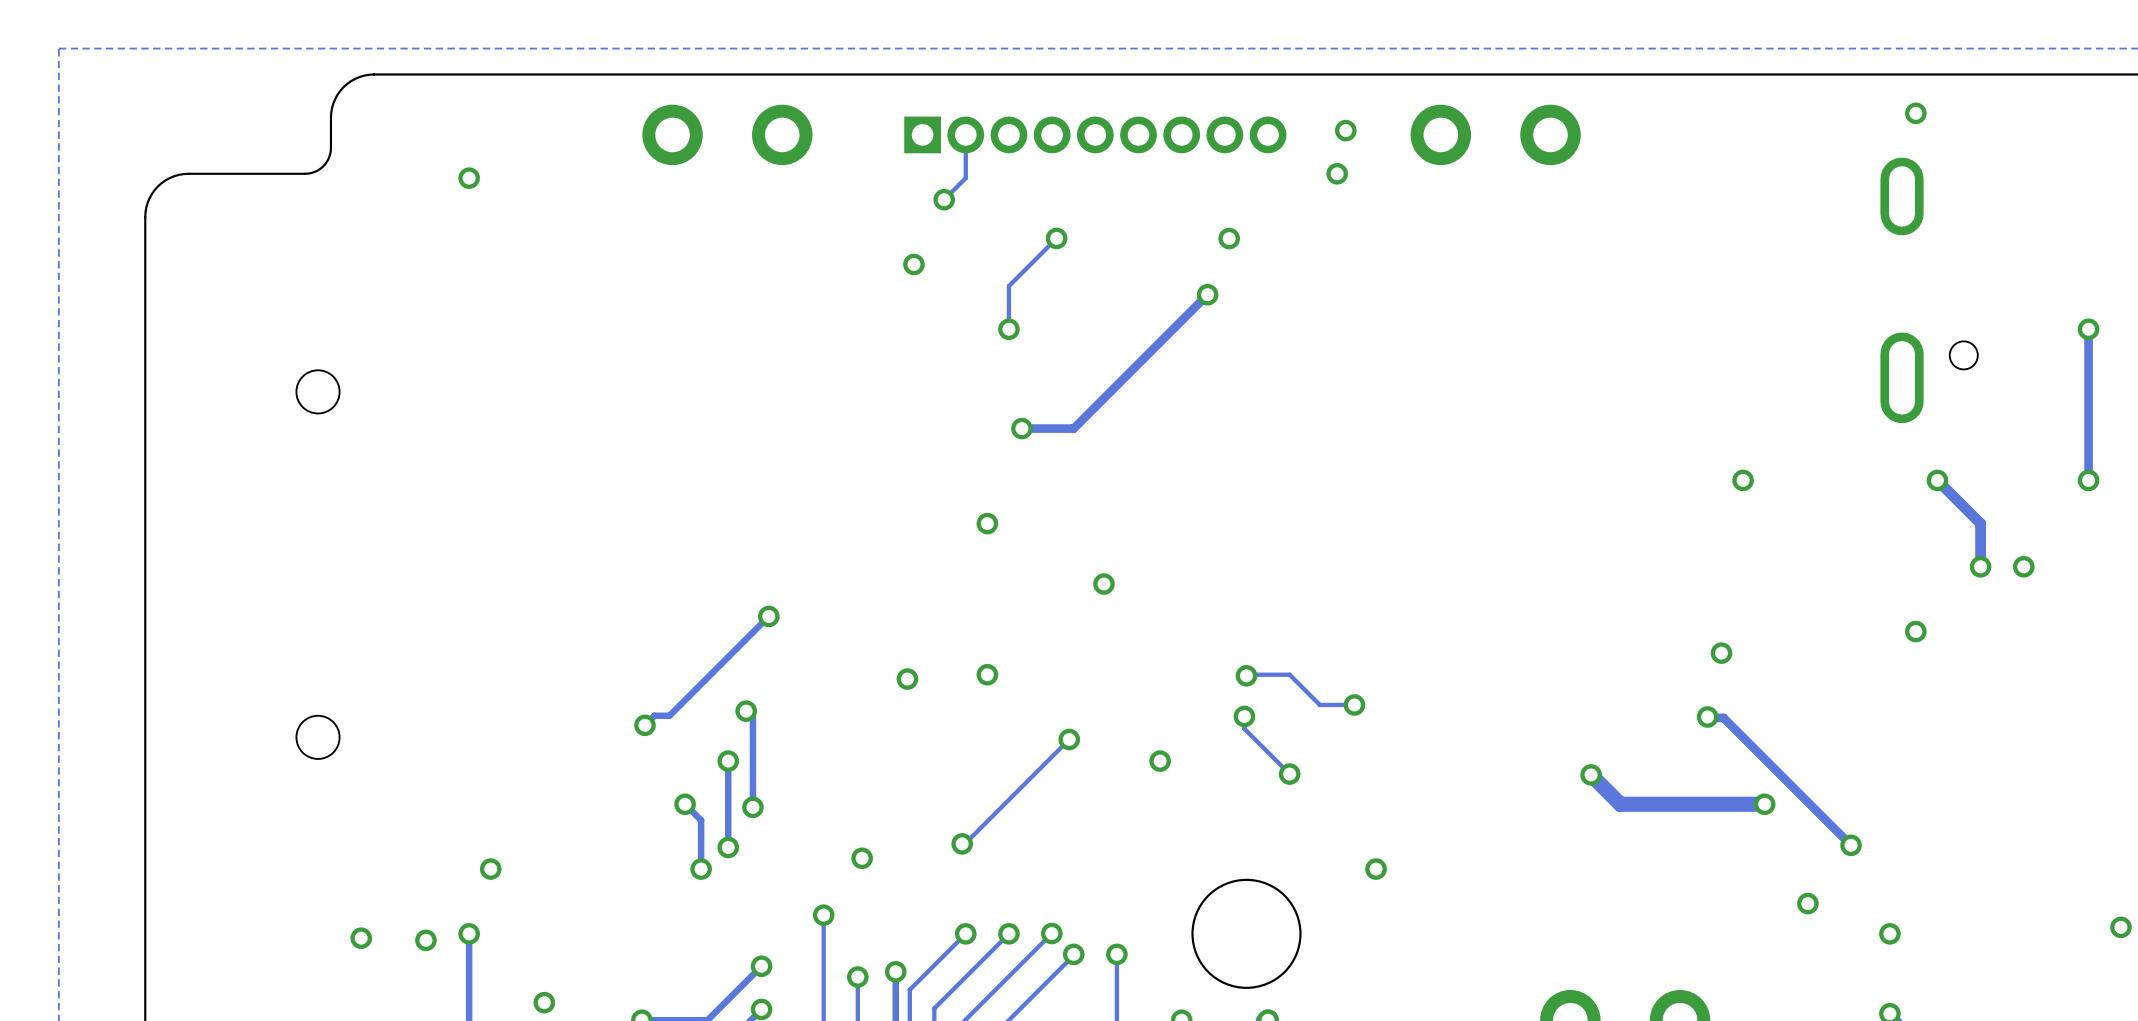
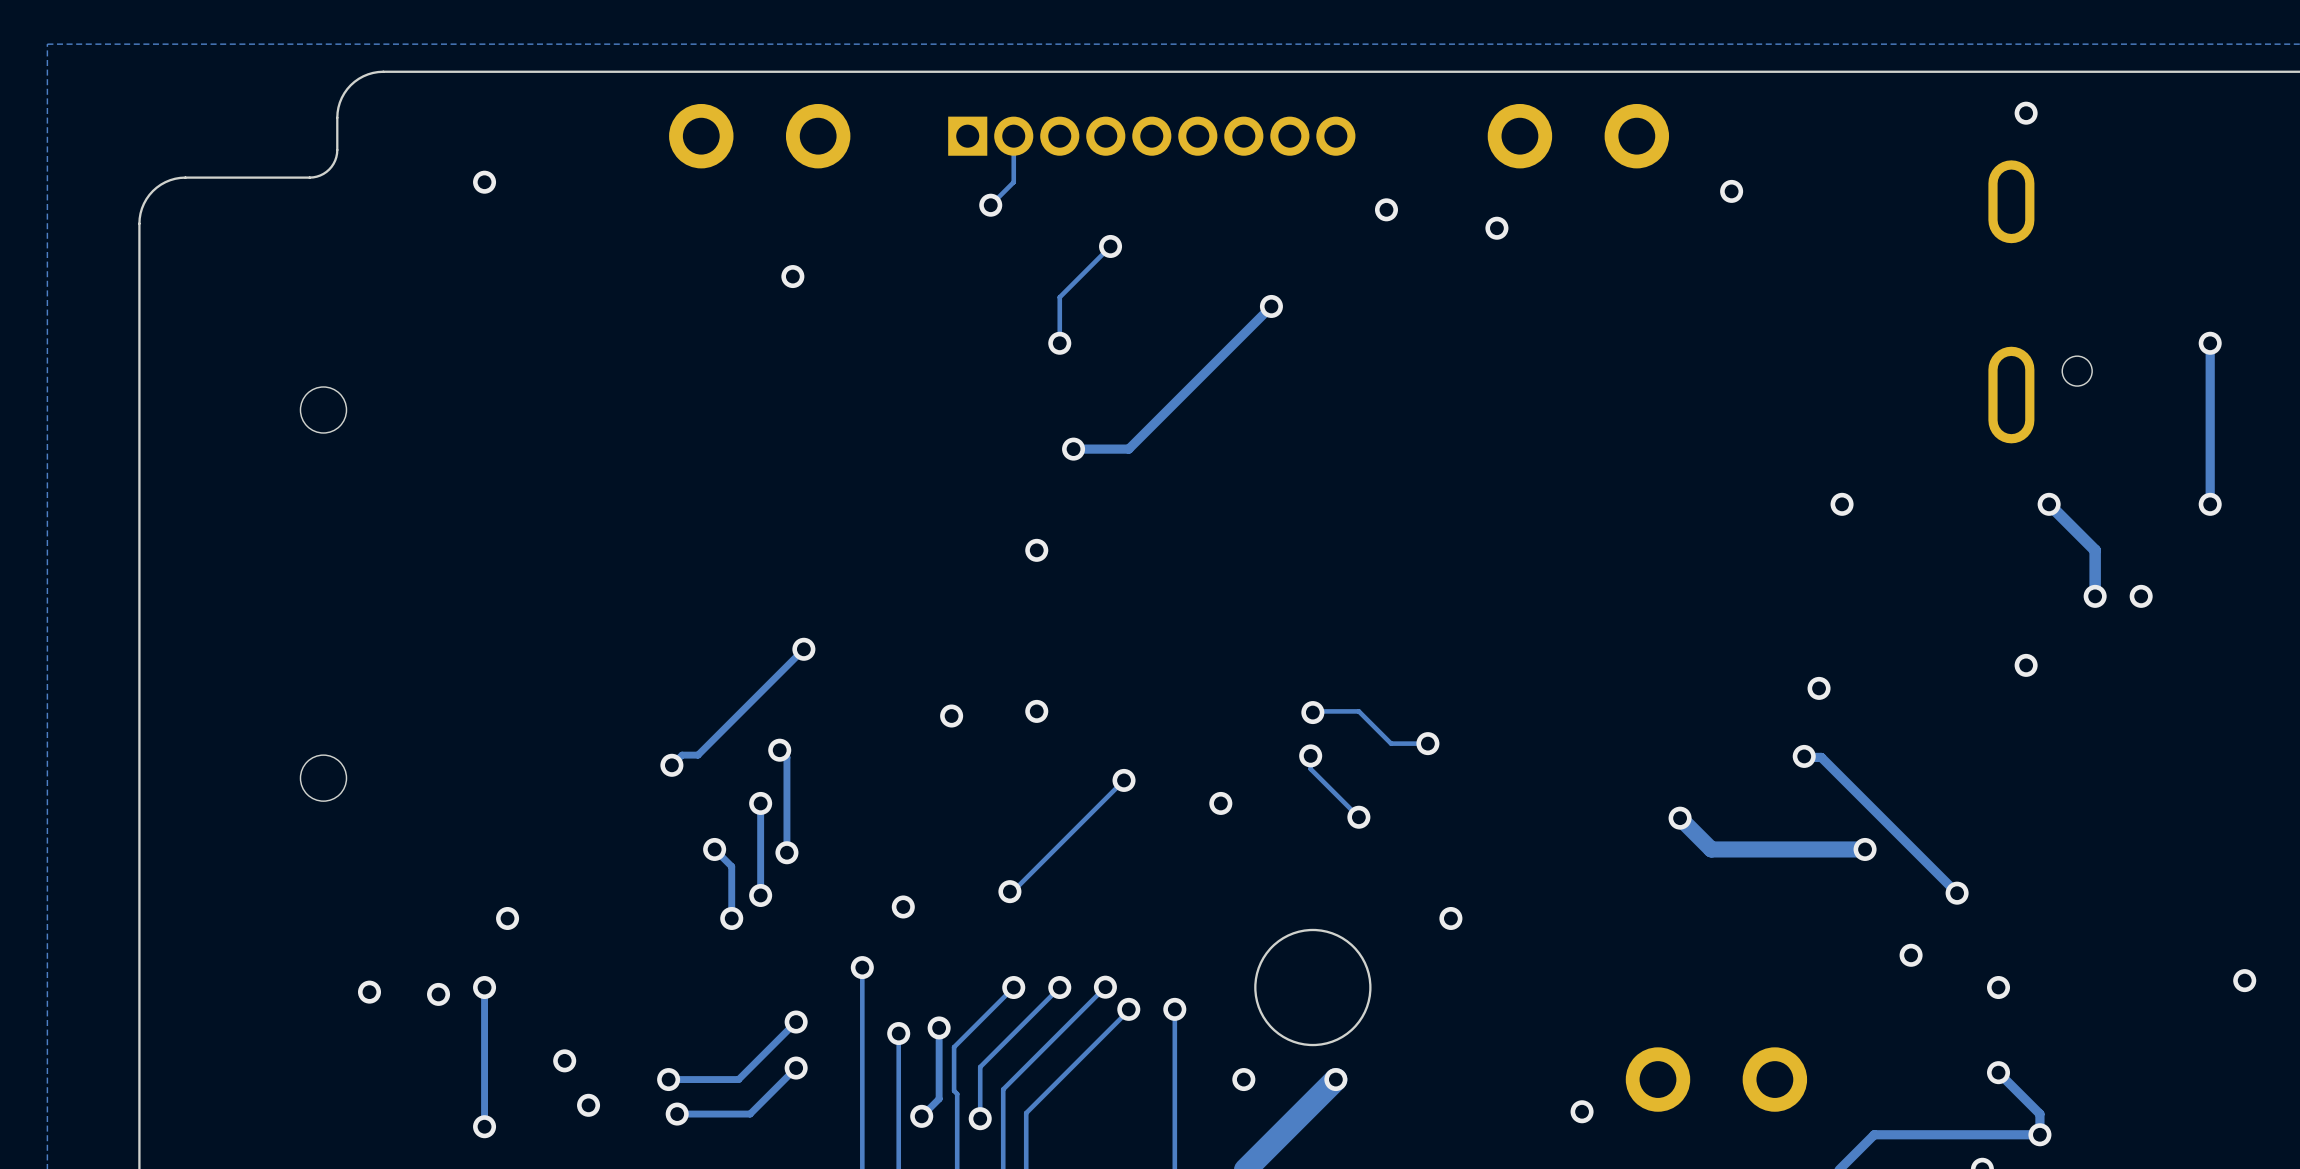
via: (1345, 130) -> none
via position: (1337, 173) -> (1386, 209)
via: none -> (1731, 191)
via: none -> (1496, 228)
via: (1229, 238) -> none
via position: (913, 264) -> (792, 276)
via: (1103, 584) -> none

